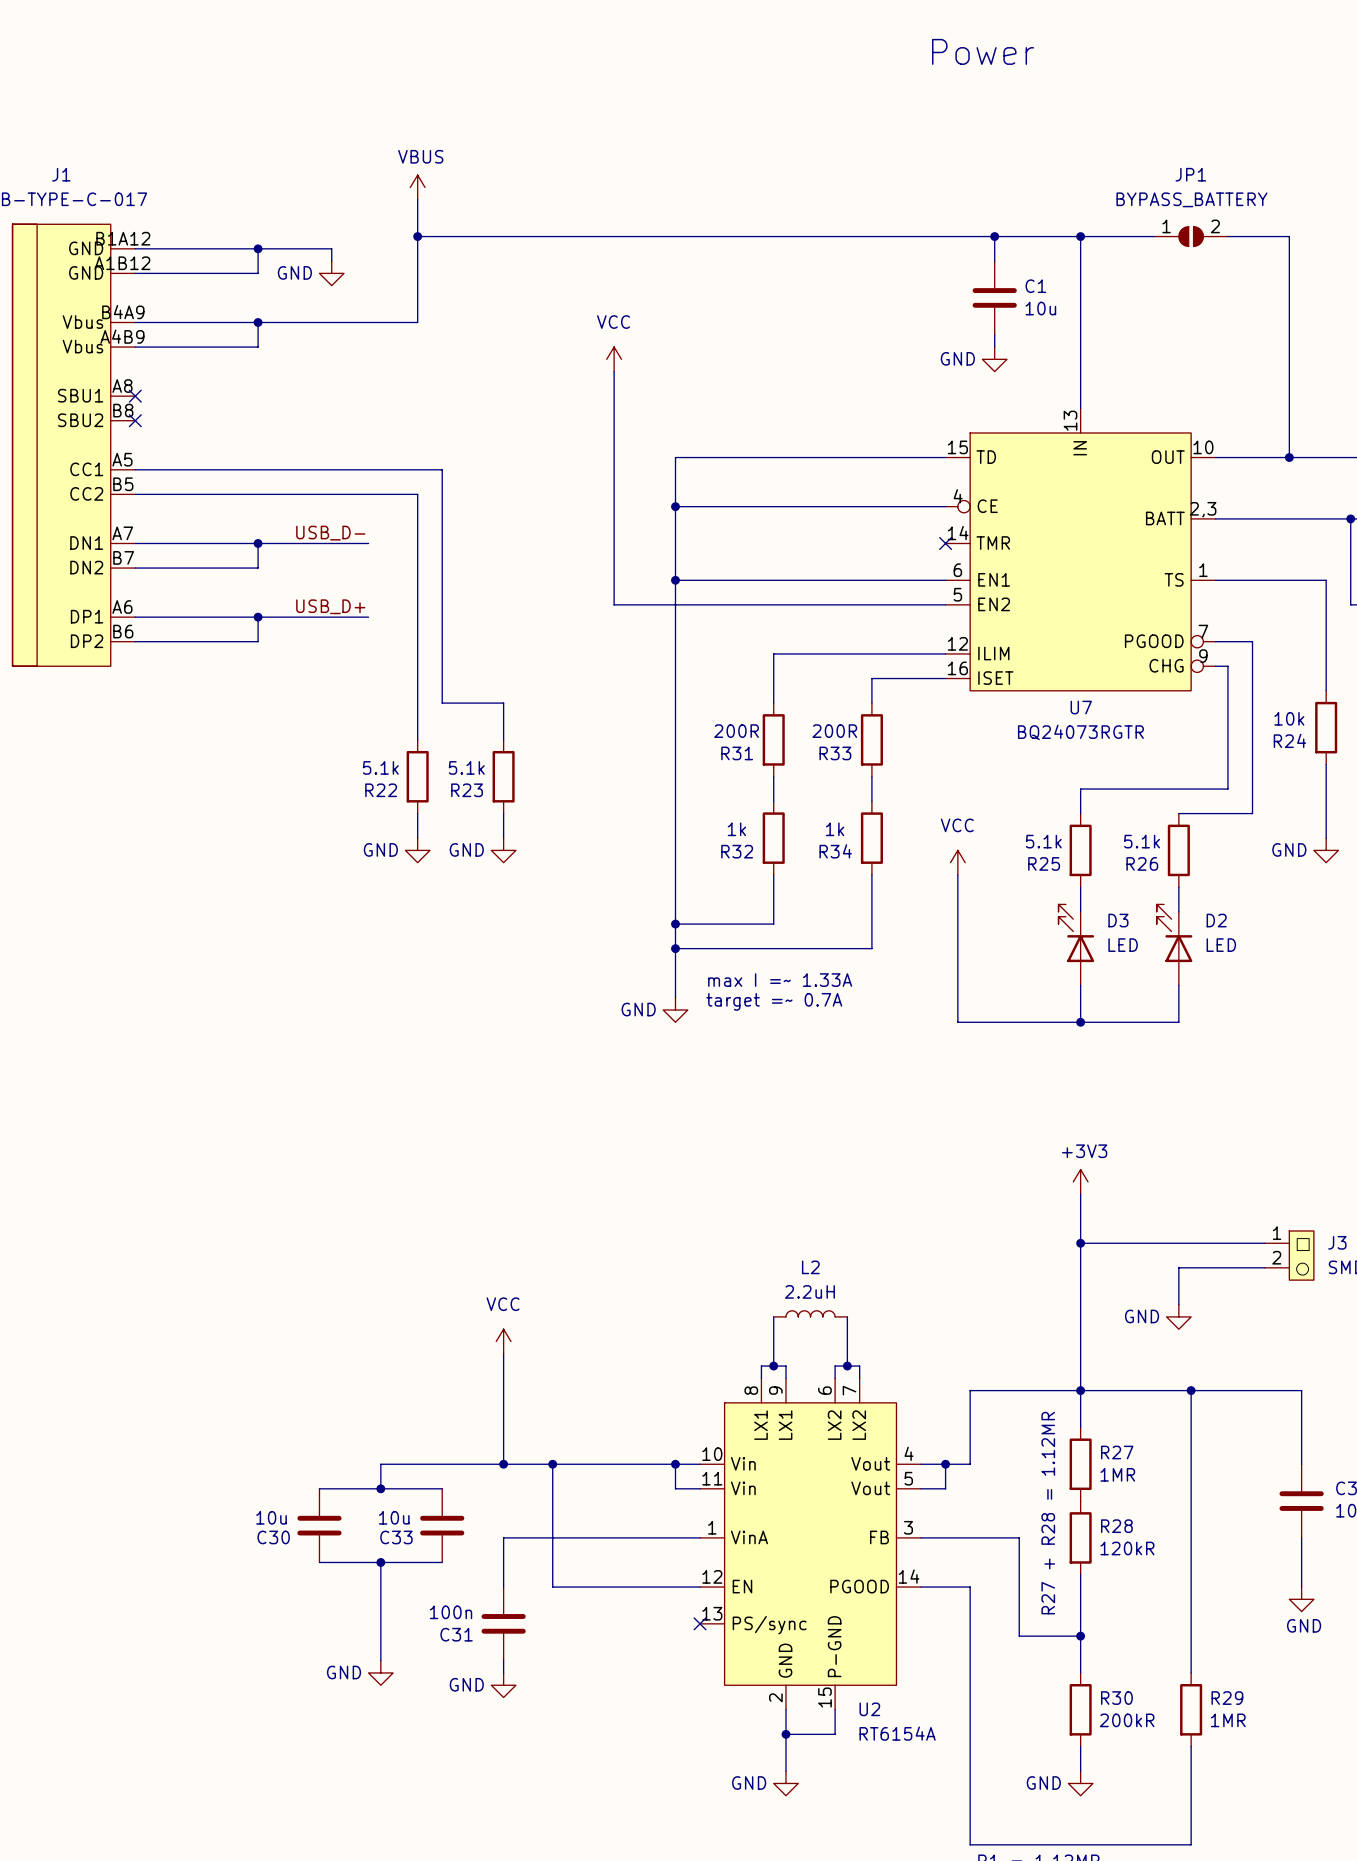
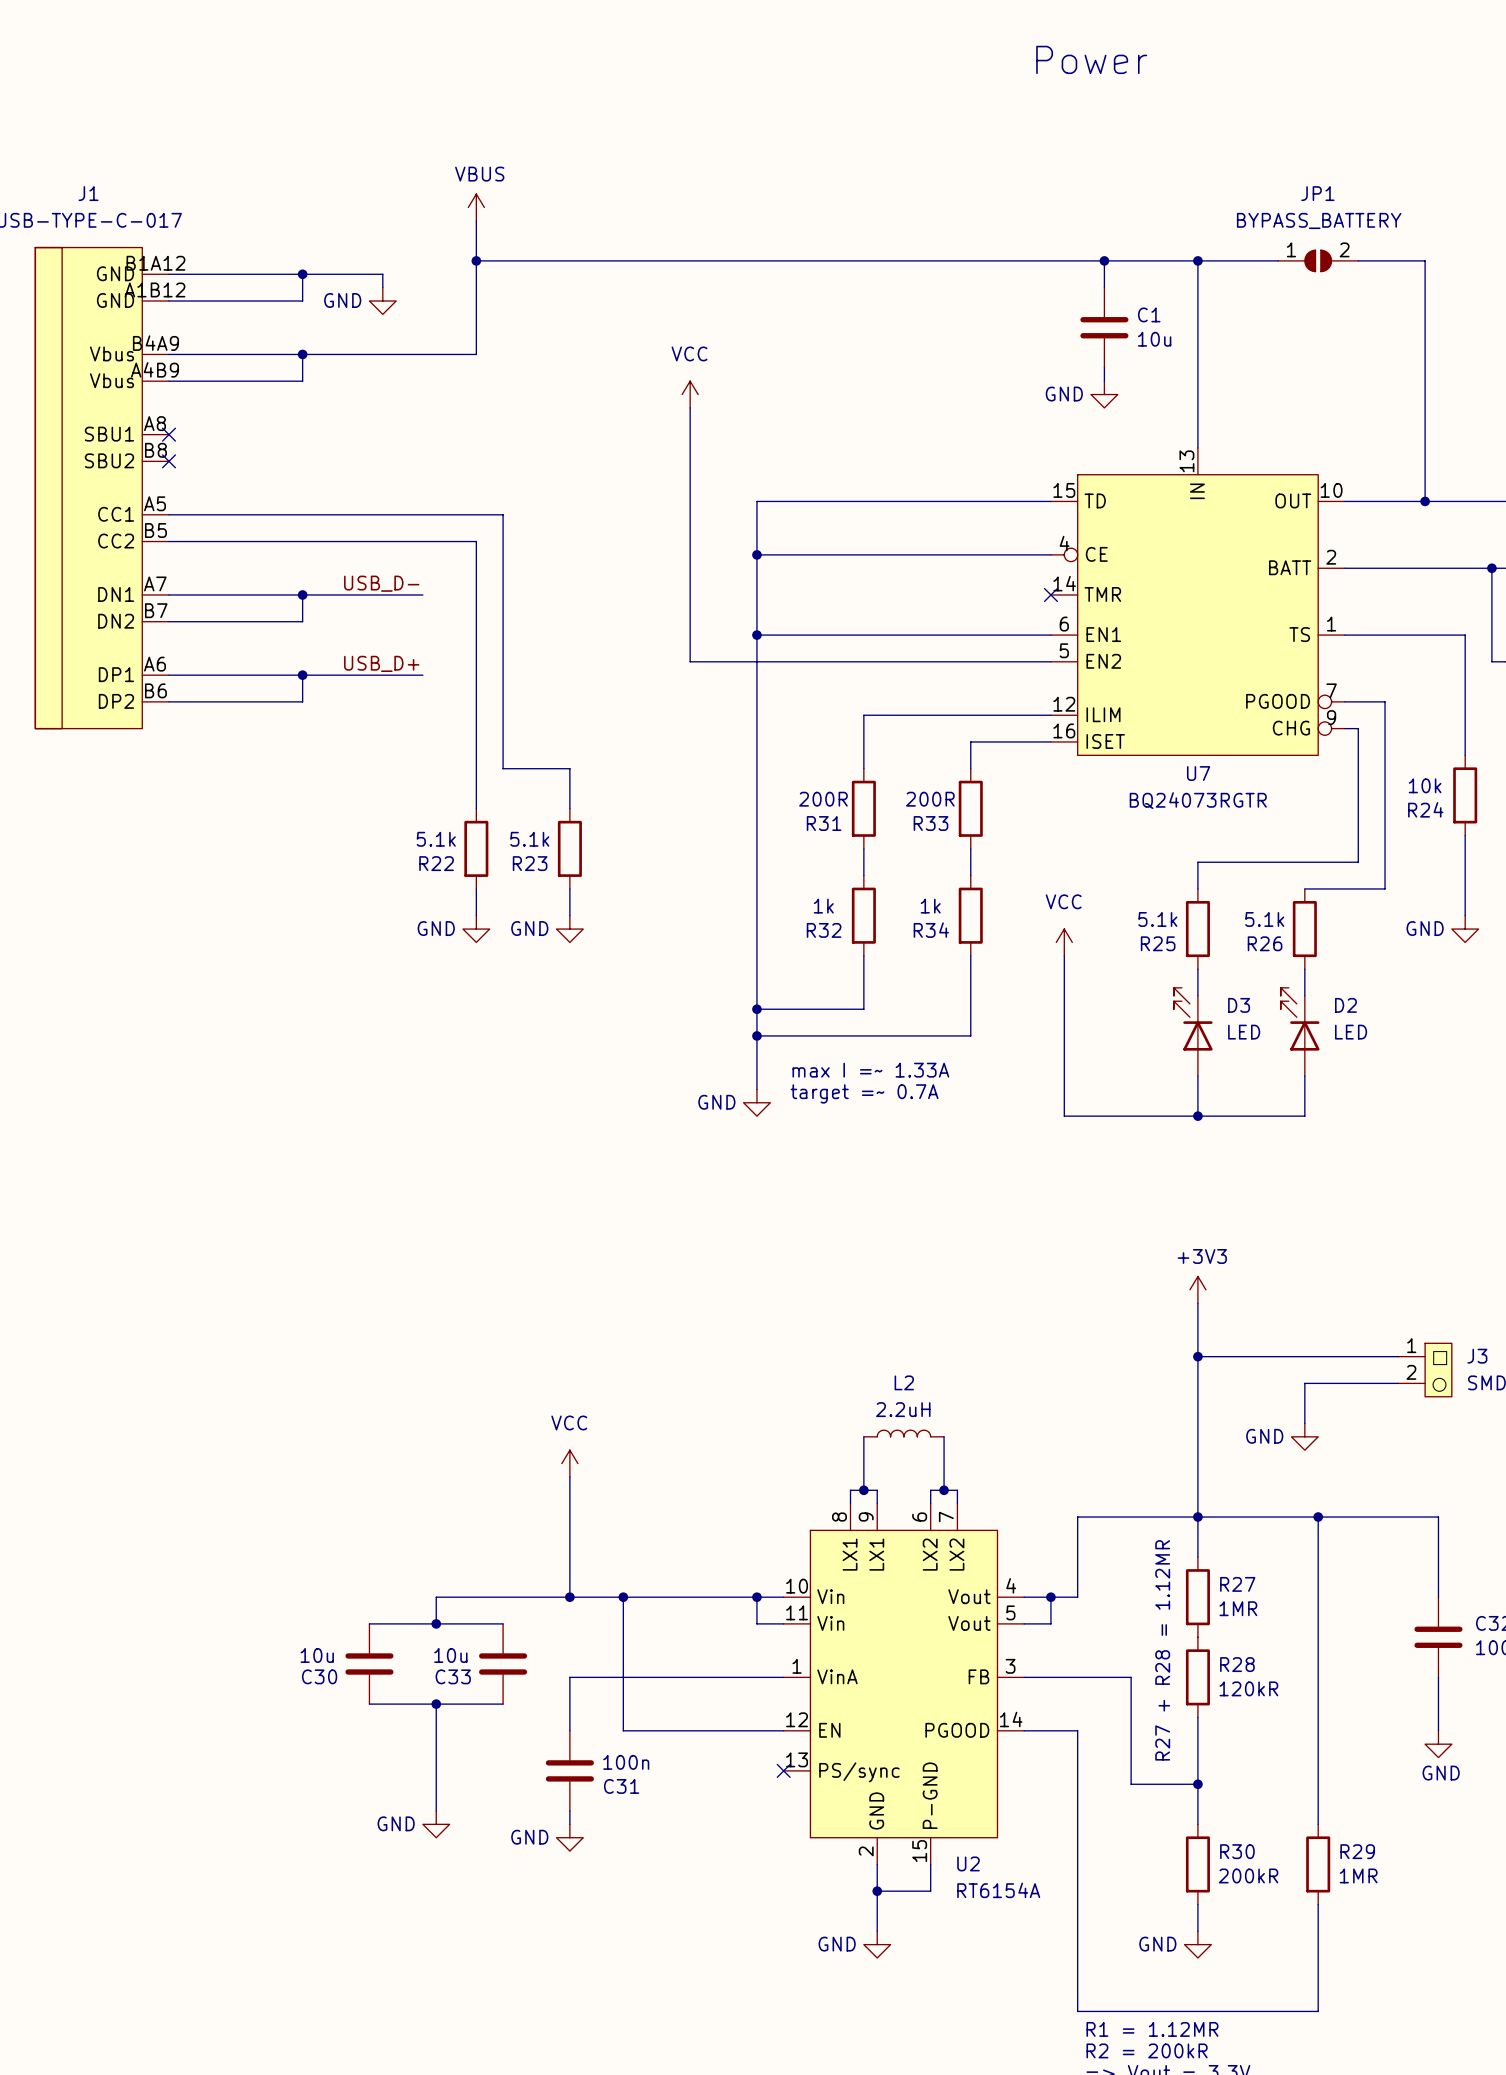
U7 pin number: 2,3 (1203, 509) -> 2 (1331, 557)
C31 value position: 100n (451, 1612) -> 100n (626, 1762)
C31 name position: C31 (456, 1634) -> C31 (621, 1786)

